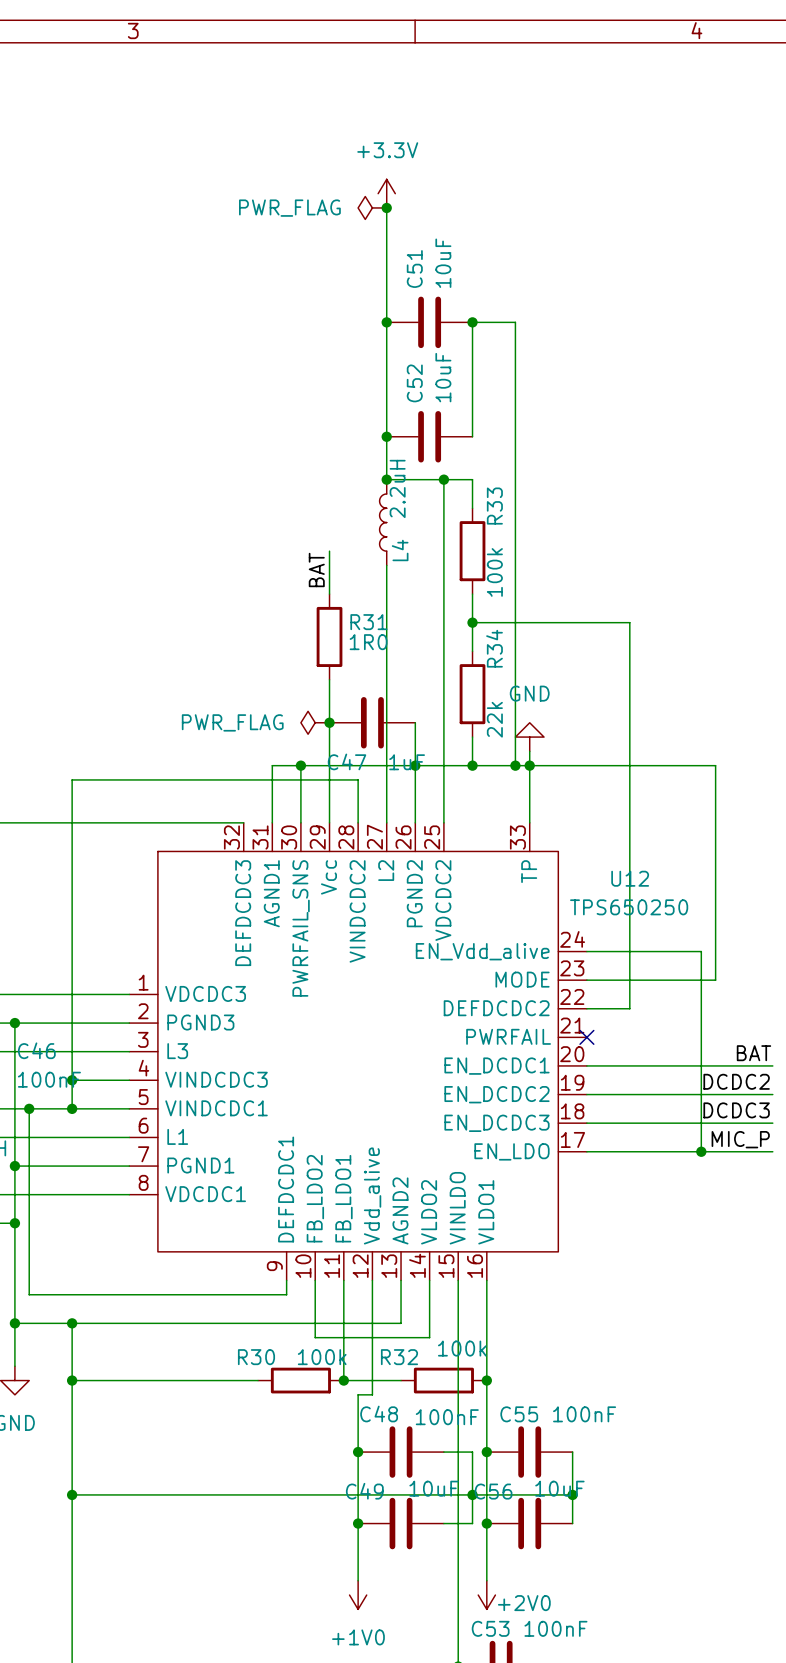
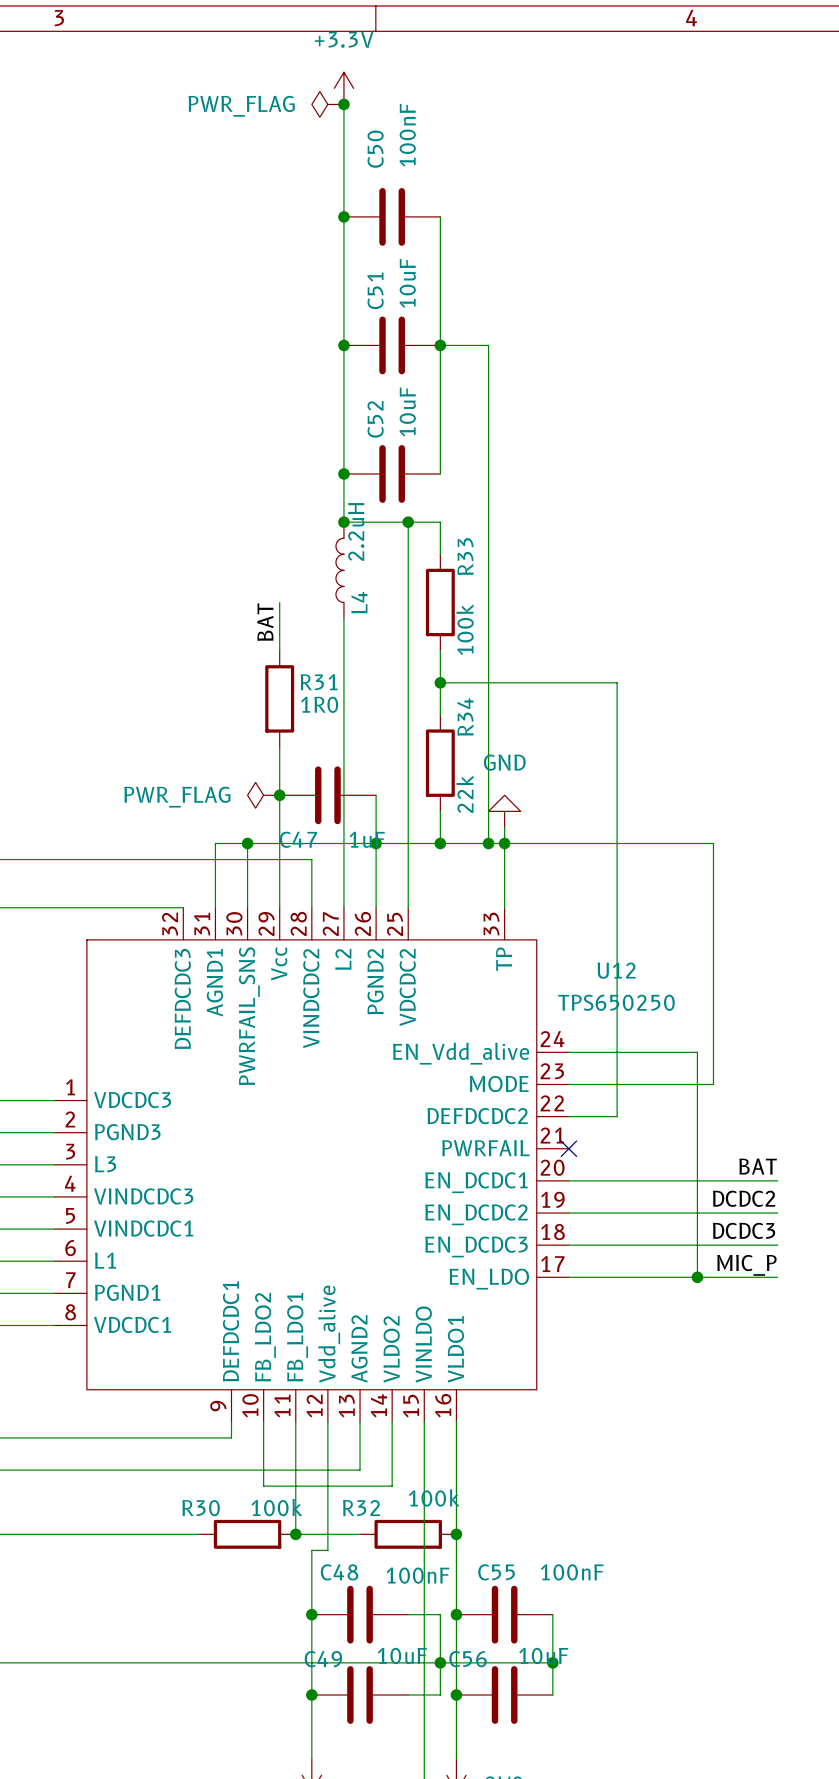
wire: none -> (343, 104) (343, 216)
junction: none -> (343, 104)
power symbol position: +3.3V (386, 193) -> +3.3V (343, 88)
power symbol position: PWR_FLAG (372, 207) -> PWR_FLAG (327, 104)
C50: none -> 100nF (392, 216)
wire: none -> (440, 216) (440, 345)

